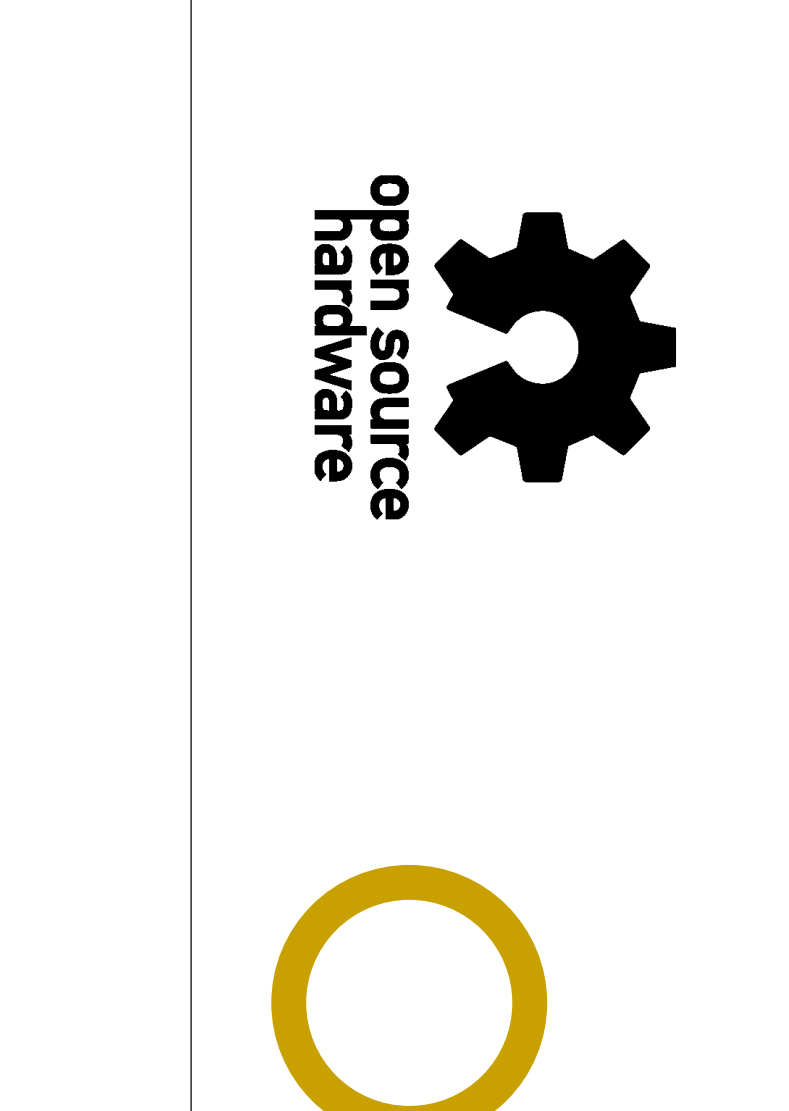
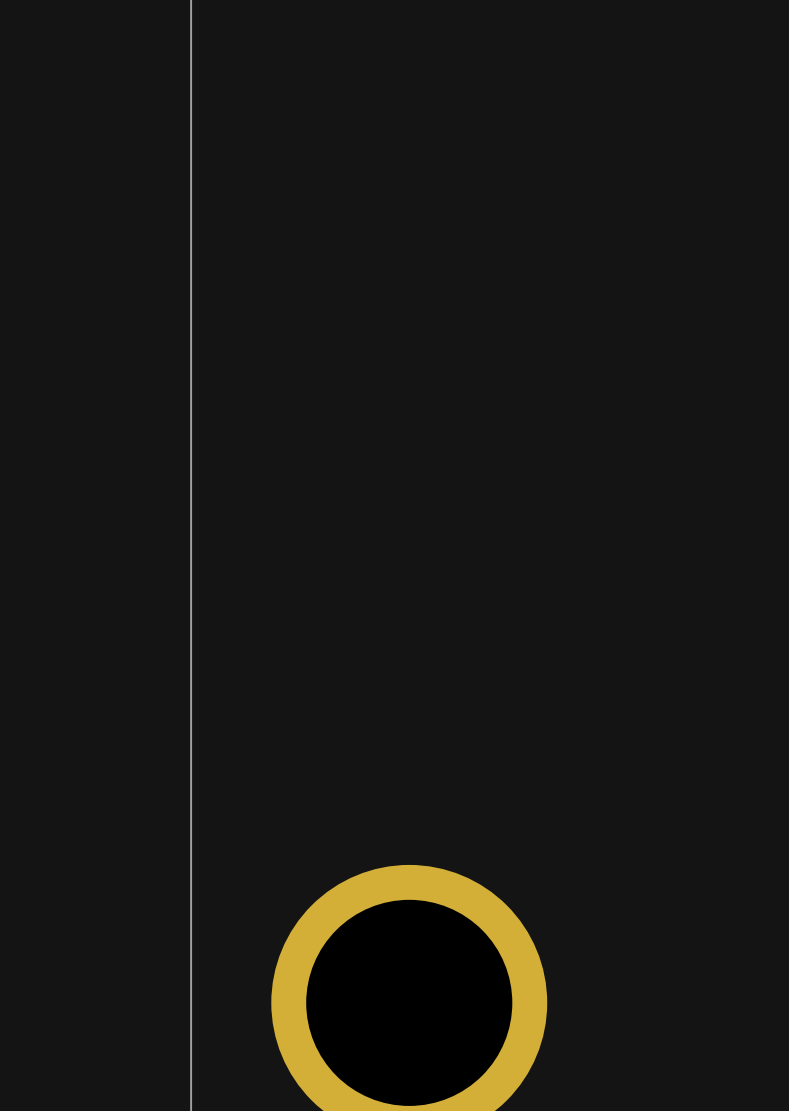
drawing: [314, 175, 677, 520] -> none

